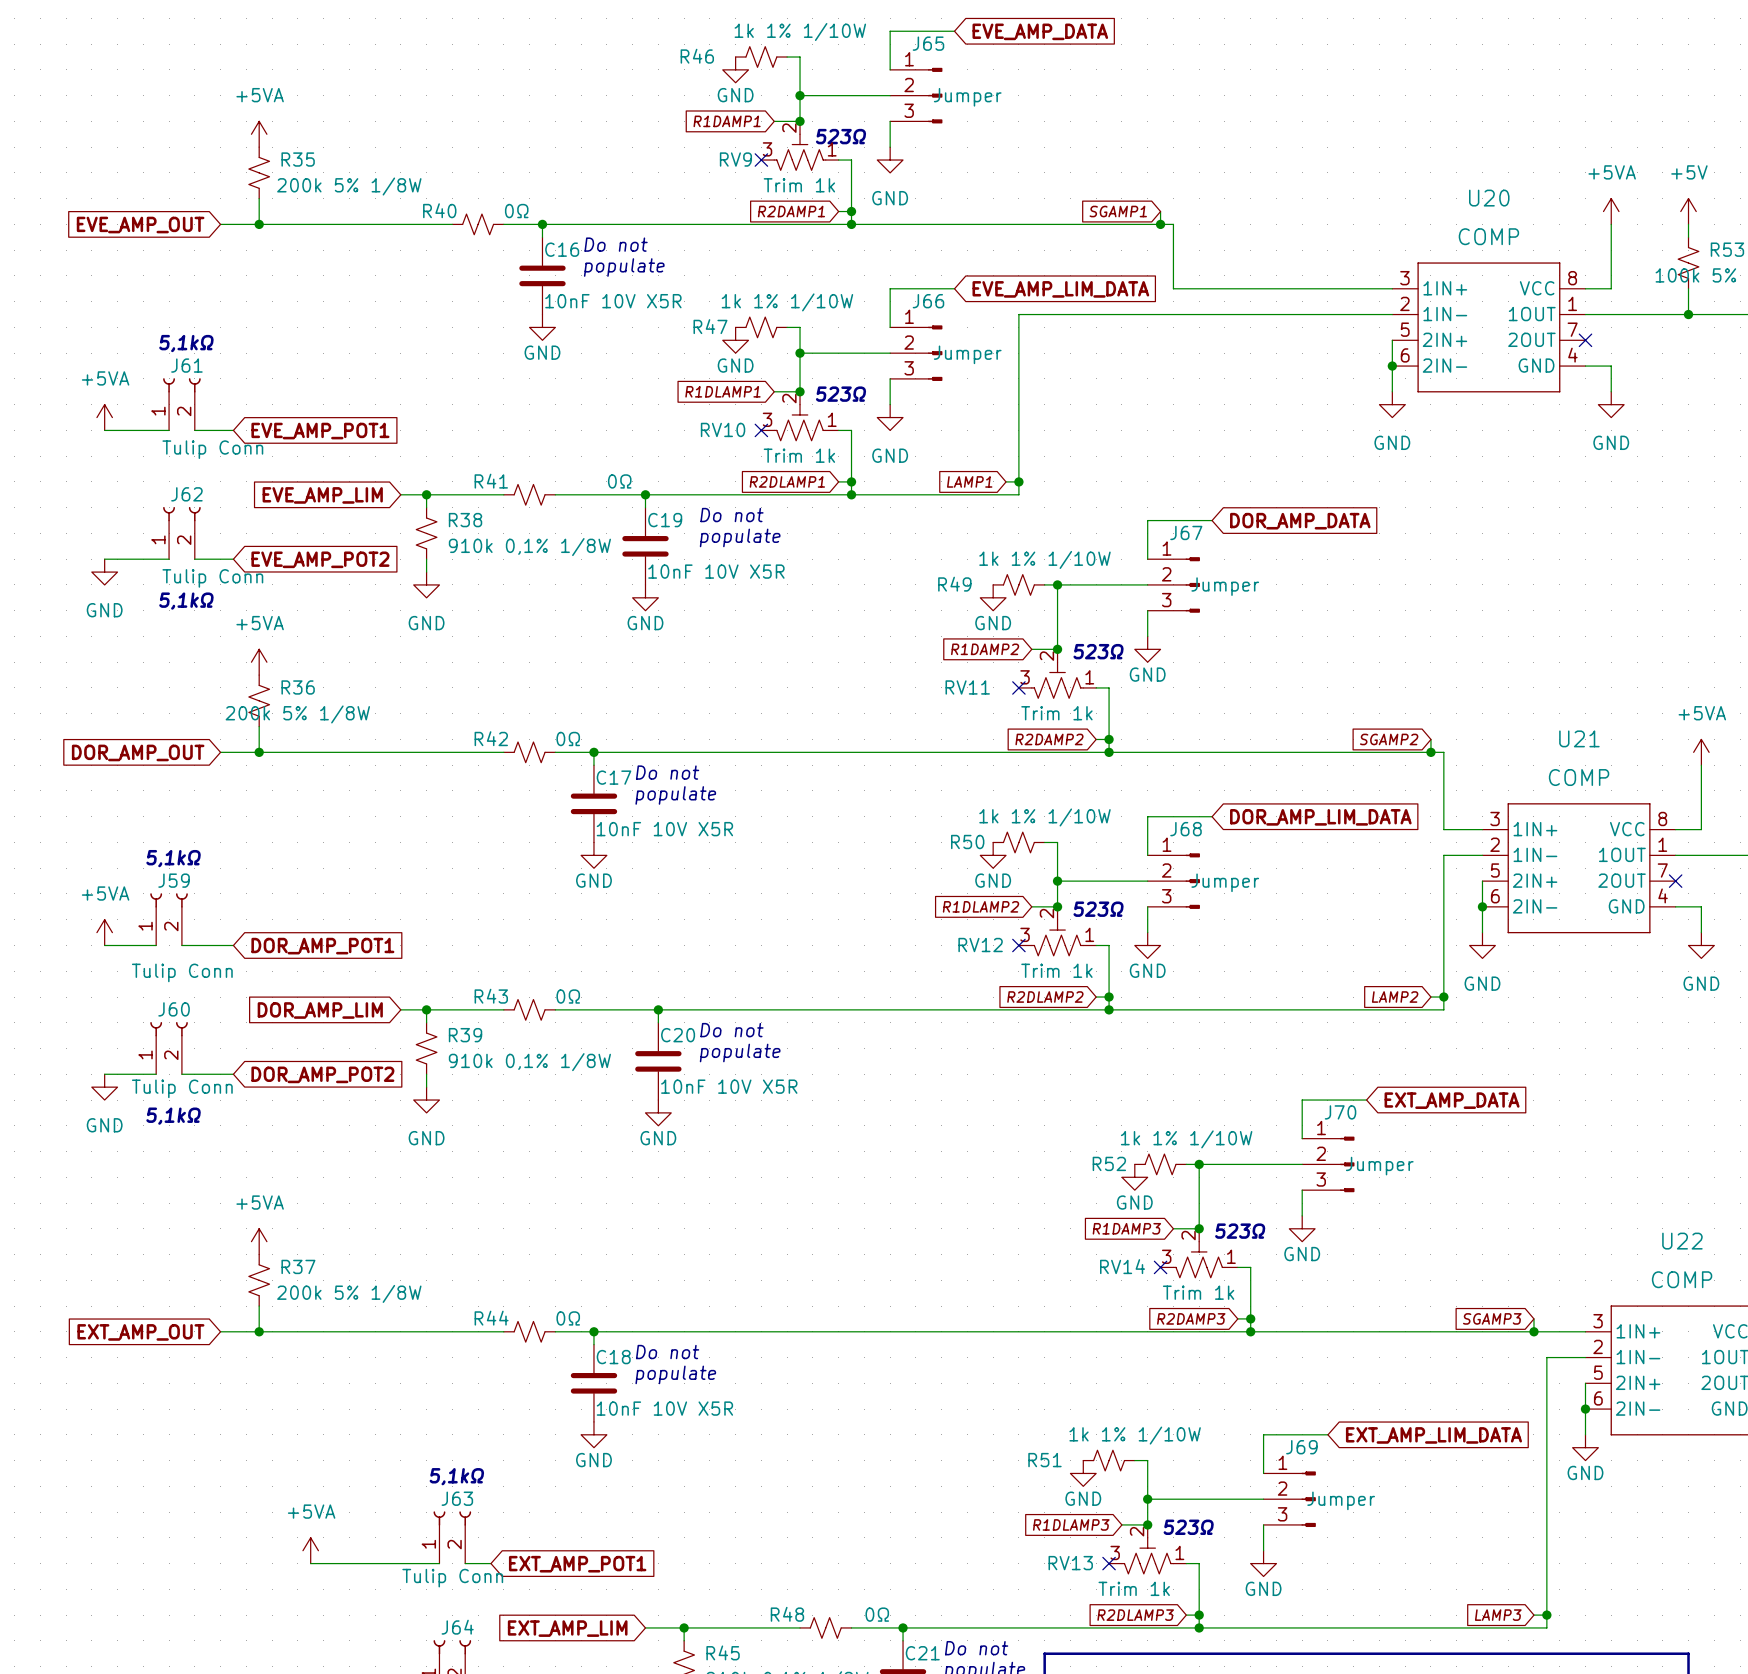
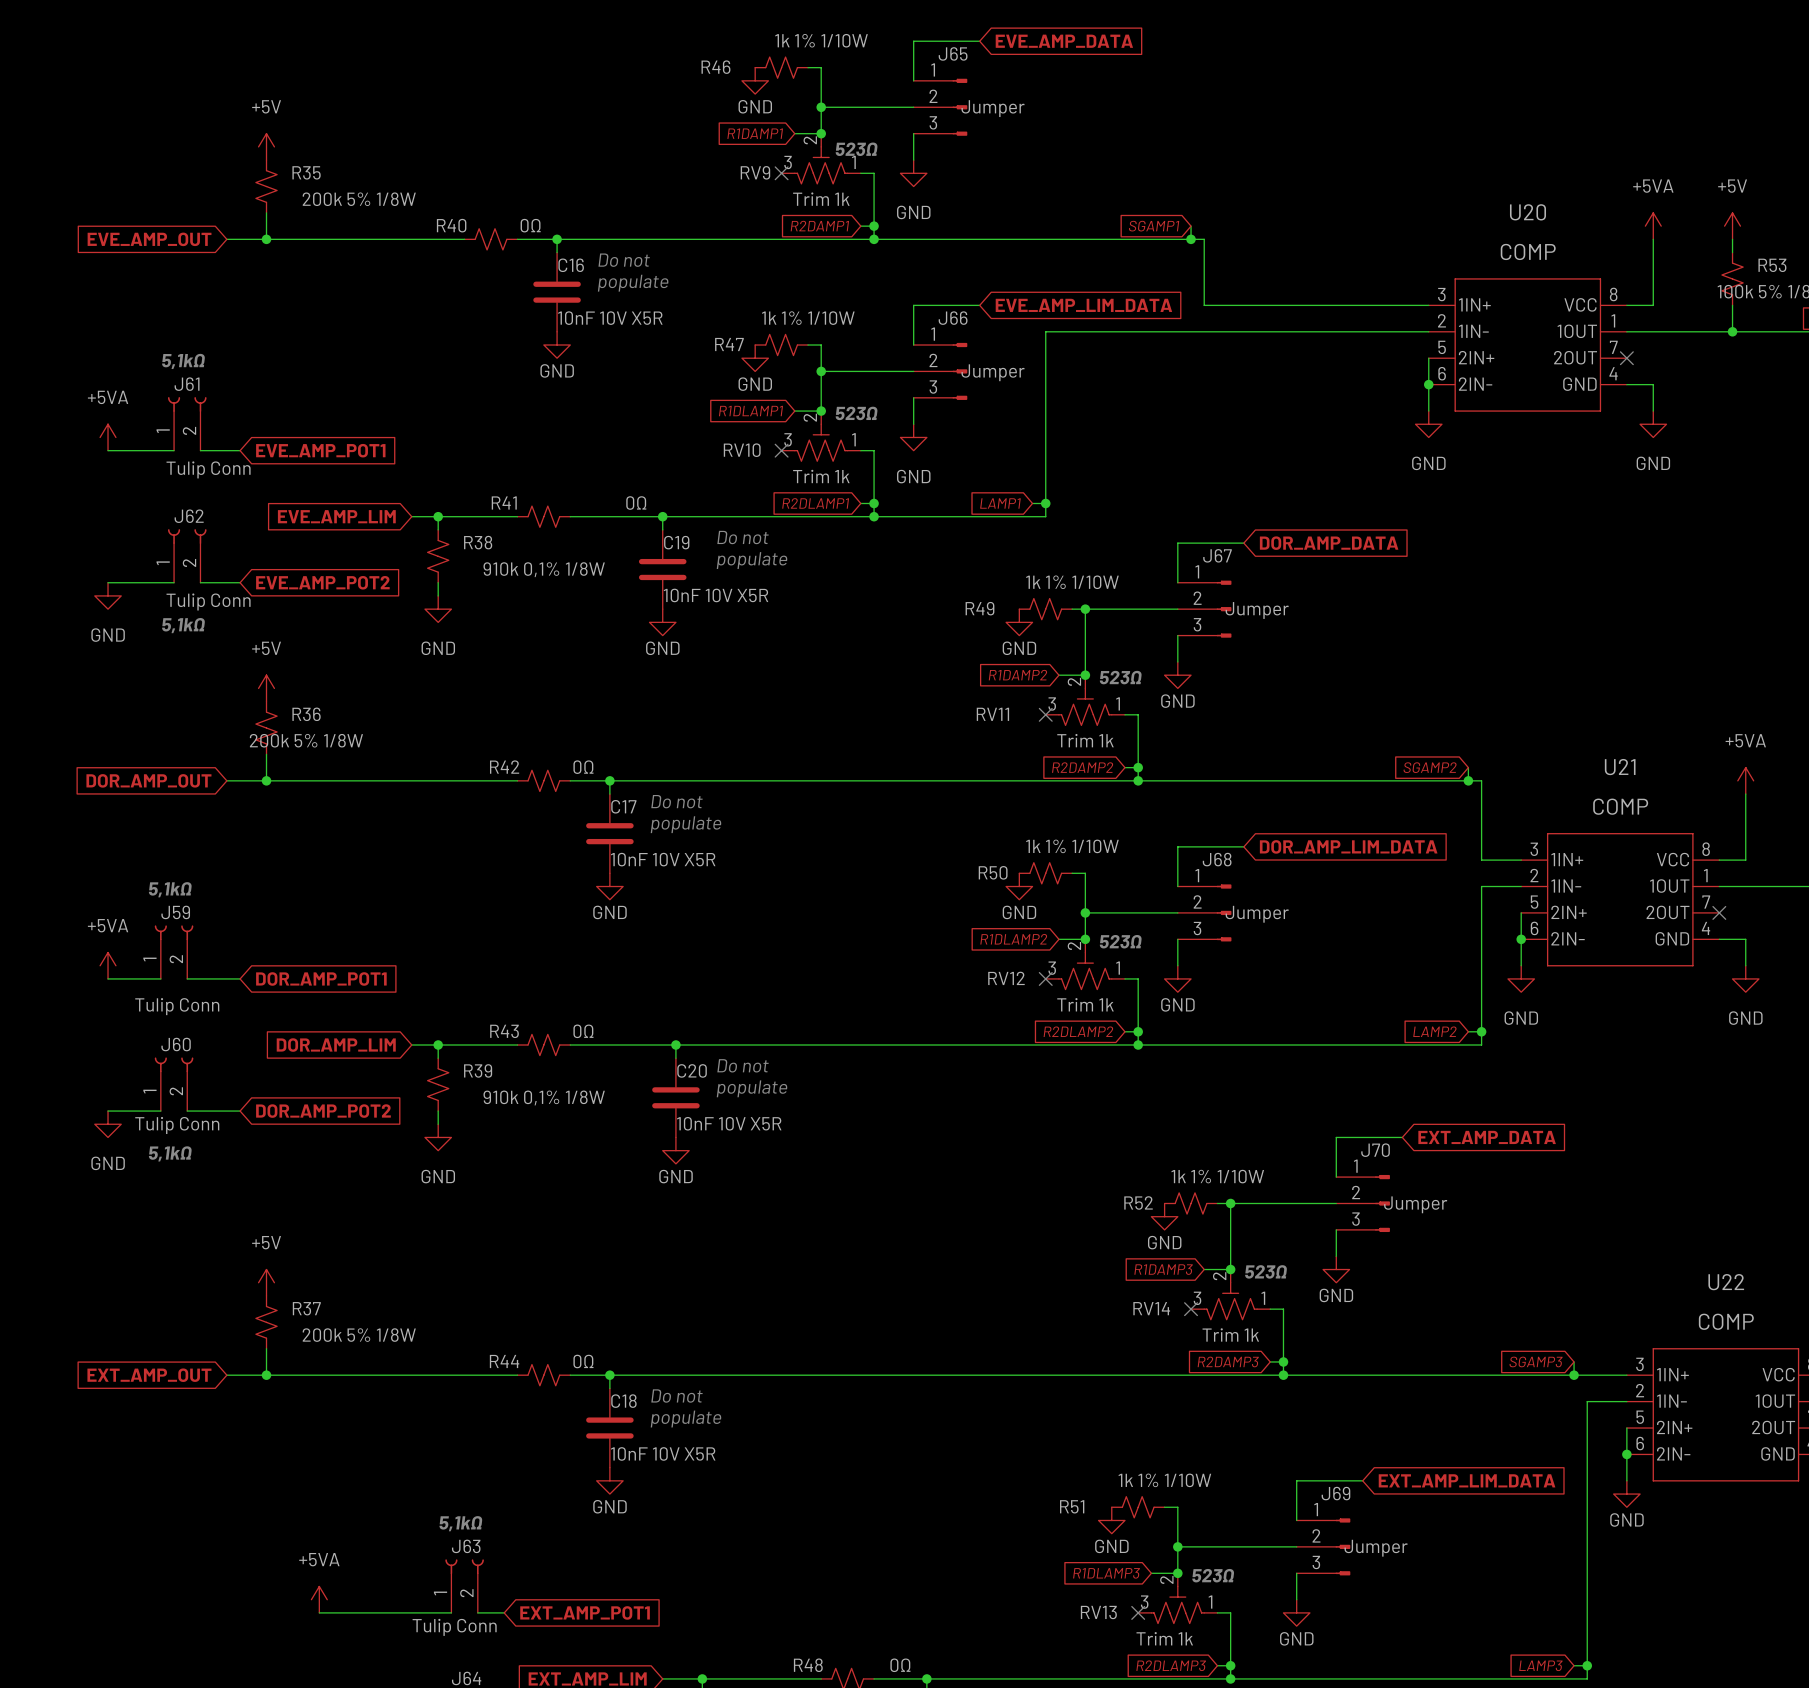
power symbol: +5VA (259, 134) -> +5V (266, 146)
power symbol: +5VA (259, 662) -> +5V (266, 688)
power symbol: +5VA (259, 1241) -> +5V (266, 1282)

